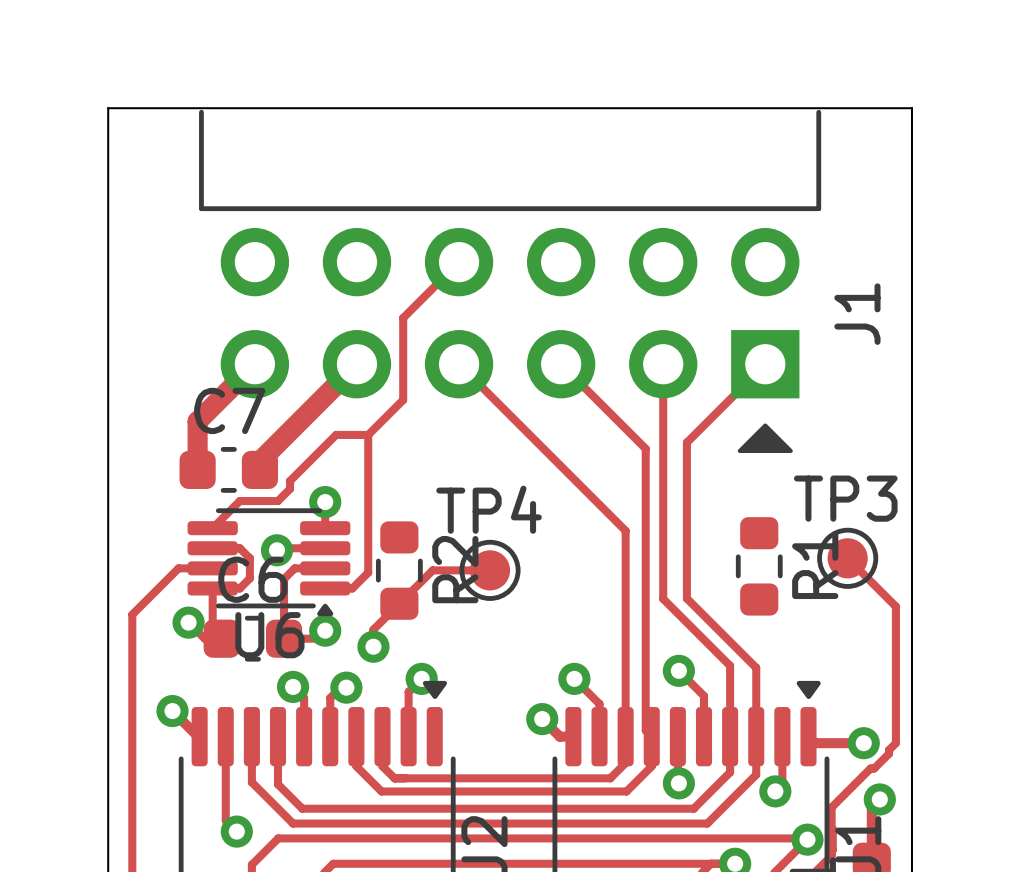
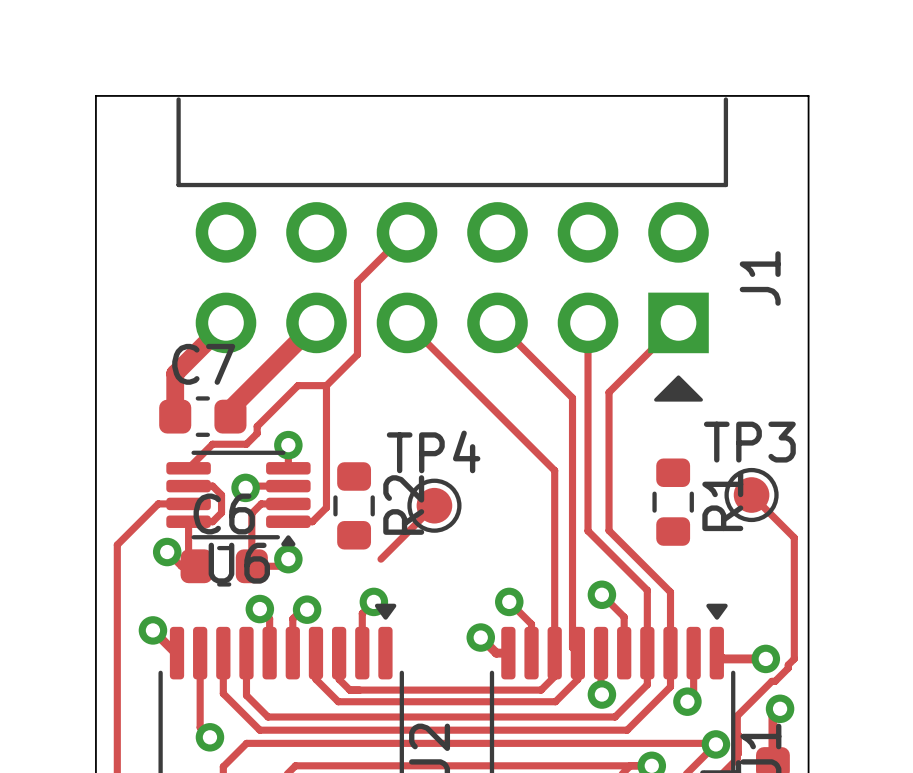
track: (490, 570) (432, 570) (373, 629) (373, 646) -> (434, 505) (380, 559)
via: (373, 646) -> none

